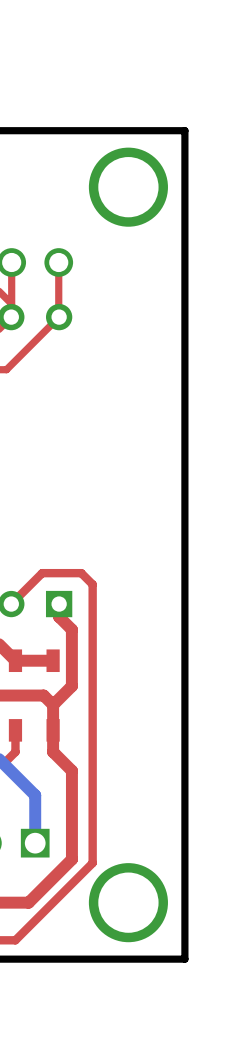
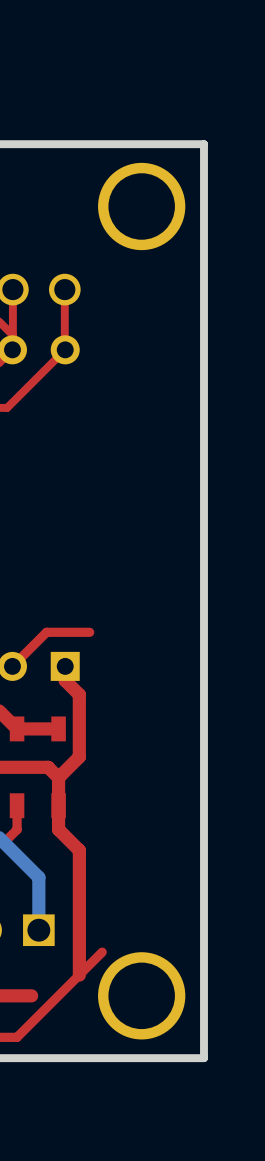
top track: (81, 573) (92, 584) (92, 863) -> none
top track: (71, 859) (28, 902) -> (79, 948) (79, 975)

